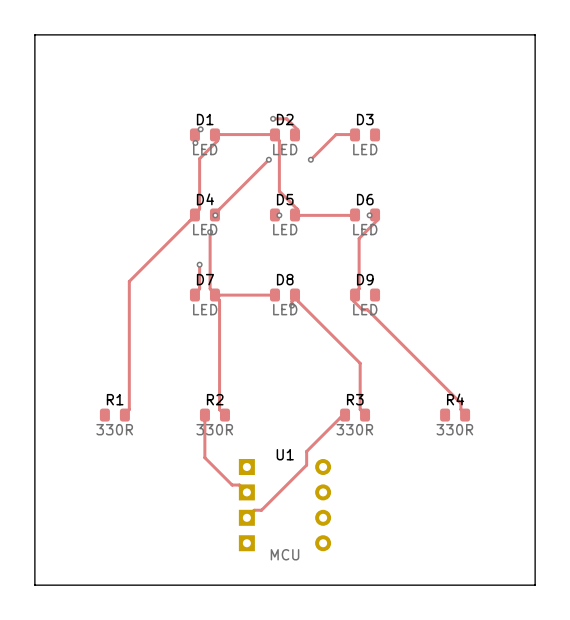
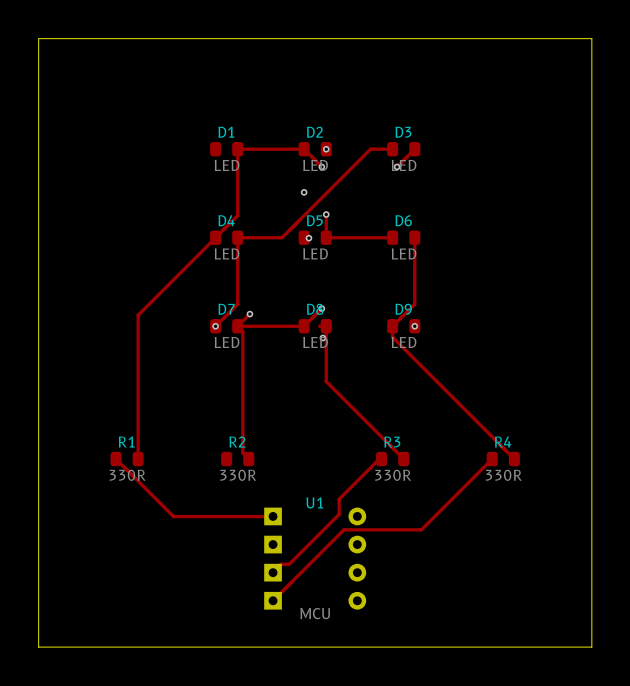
track: (273, 118) (286, 118) (297, 129) (295, 134) -> none
via: (273, 118) -> none
via: (200, 129) -> none
via: none -> (326, 149)
track: (355, 134) (336, 134) (310, 159) -> (392, 149) (370, 149) (282, 237) (237, 237) (237, 304) (215, 326)
track: none -> (414, 149) (397, 166)
via: (195, 142) -> none
via: none -> (321, 166)
via: none -> (397, 166)
track: (268, 159) (214, 214) -> none
via: (268, 159) -> none
via: (310, 159) -> none
via: none -> (304, 192)
track: none -> (326, 214) (326, 237) (392, 237)
via: none -> (326, 214)
track: (355, 214) (295, 214) (297, 209) (279, 191) (279, 140) (275, 134) (214, 134) (217, 140) (199, 158) (199, 209) (129, 281) (129, 409) (124, 415) -> (321, 166) (304, 149) (237, 149) (237, 215) (138, 315) (138, 459)
via: (215, 215) -> none
track: (369, 215) (375, 214) (376, 220) (359, 238) (359, 288) (353, 301) (362, 309) (367, 309) (460, 403) (460, 409) (465, 415) -> (414, 237) (414, 304) (392, 326) (392, 337) (514, 459)
via: (369, 215) -> none
track: (210, 232) (210, 288) (214, 295) (275, 295) -> none
via: (210, 232) -> none
track: (199, 264) (199, 288) (194, 295) -> none
via: (199, 264) -> none
track: none -> (321, 308) (304, 326) (237, 326) (249, 314)
via: none -> (321, 308)
via: none -> (249, 314)
via: none -> (215, 326)
via: none -> (414, 326)
track: (291, 305) (295, 295) (298, 301) (360, 363) (360, 409) (365, 415) -> (319, 326) (326, 326) (326, 381) (403, 459)
track: none -> (116, 459) (173, 516) (273, 516)
track: (204, 415) (204, 457) (232, 485) (239, 485) (246, 492) -> none
track: none -> (492, 459) (421, 529) (343, 529) (273, 600)

